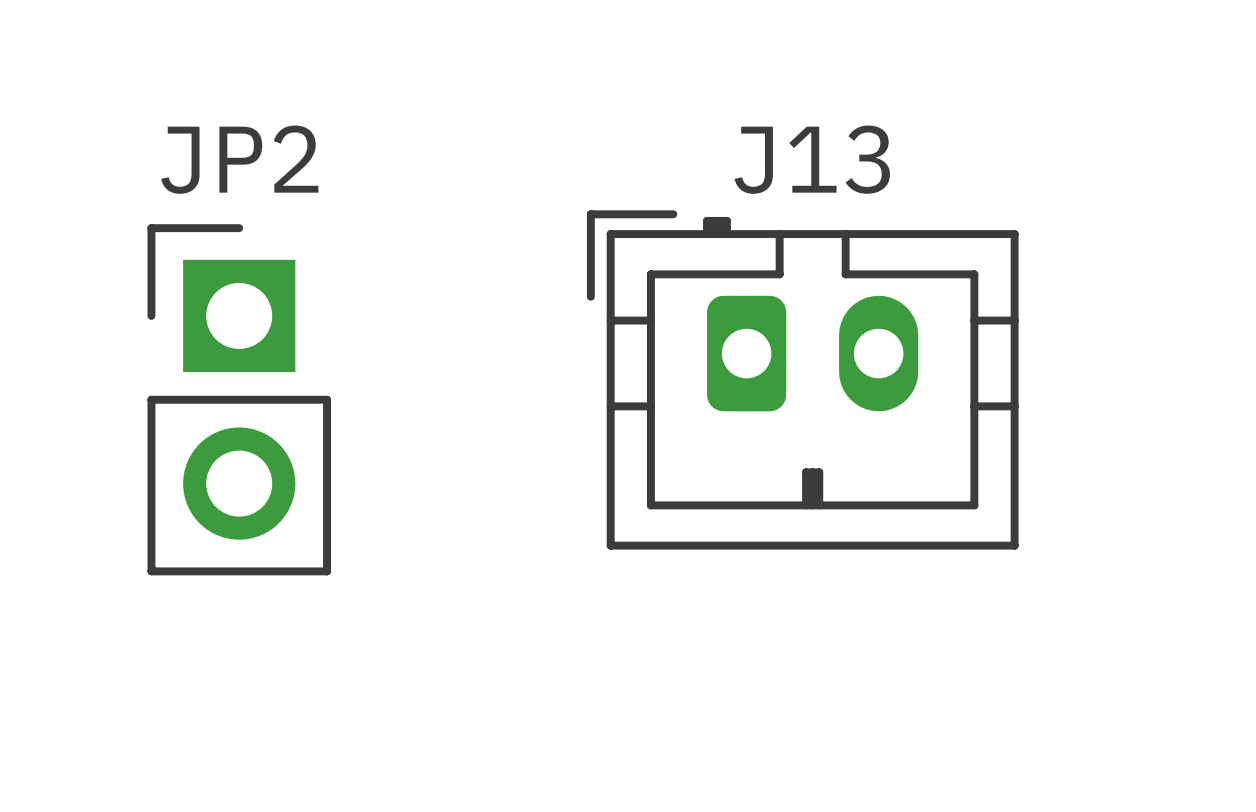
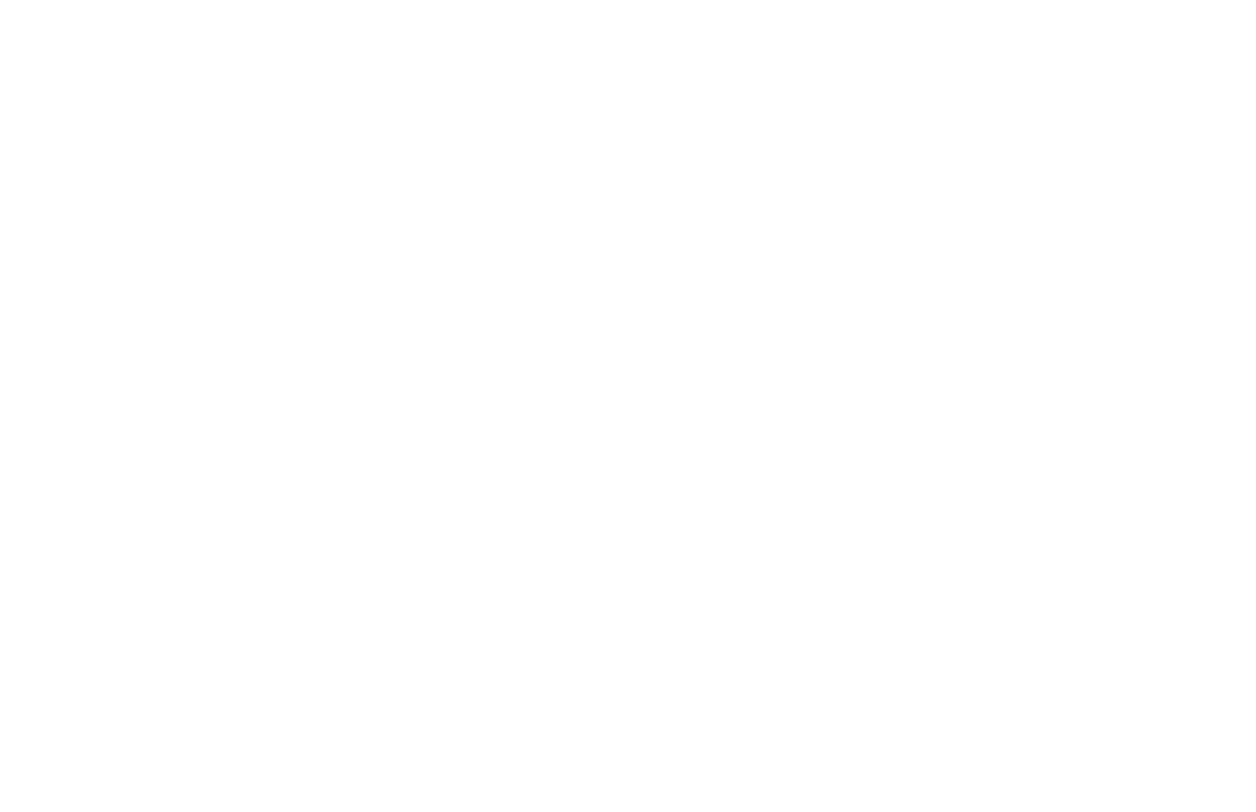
J13: (802, 379) -> none
JP2: (239, 399) -> none

